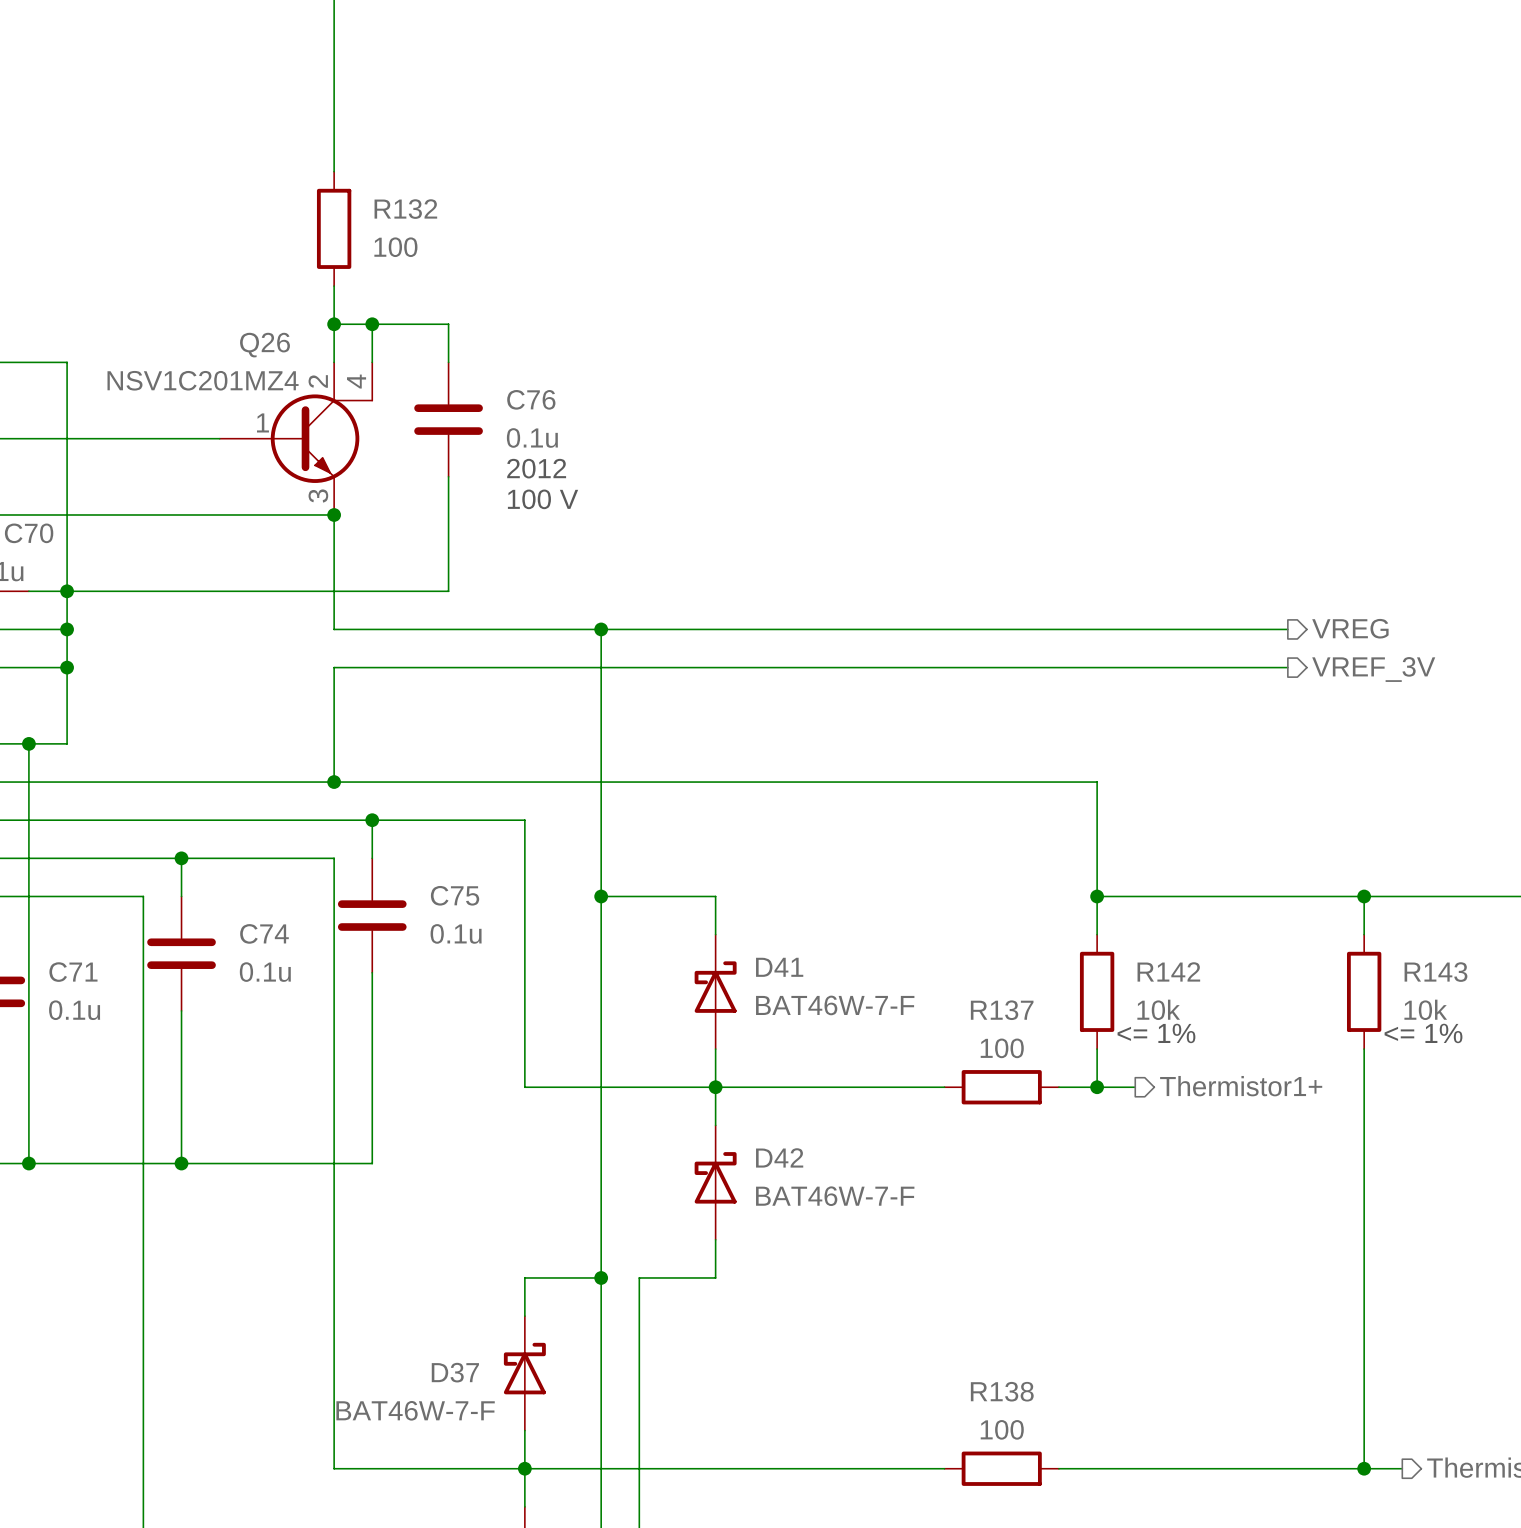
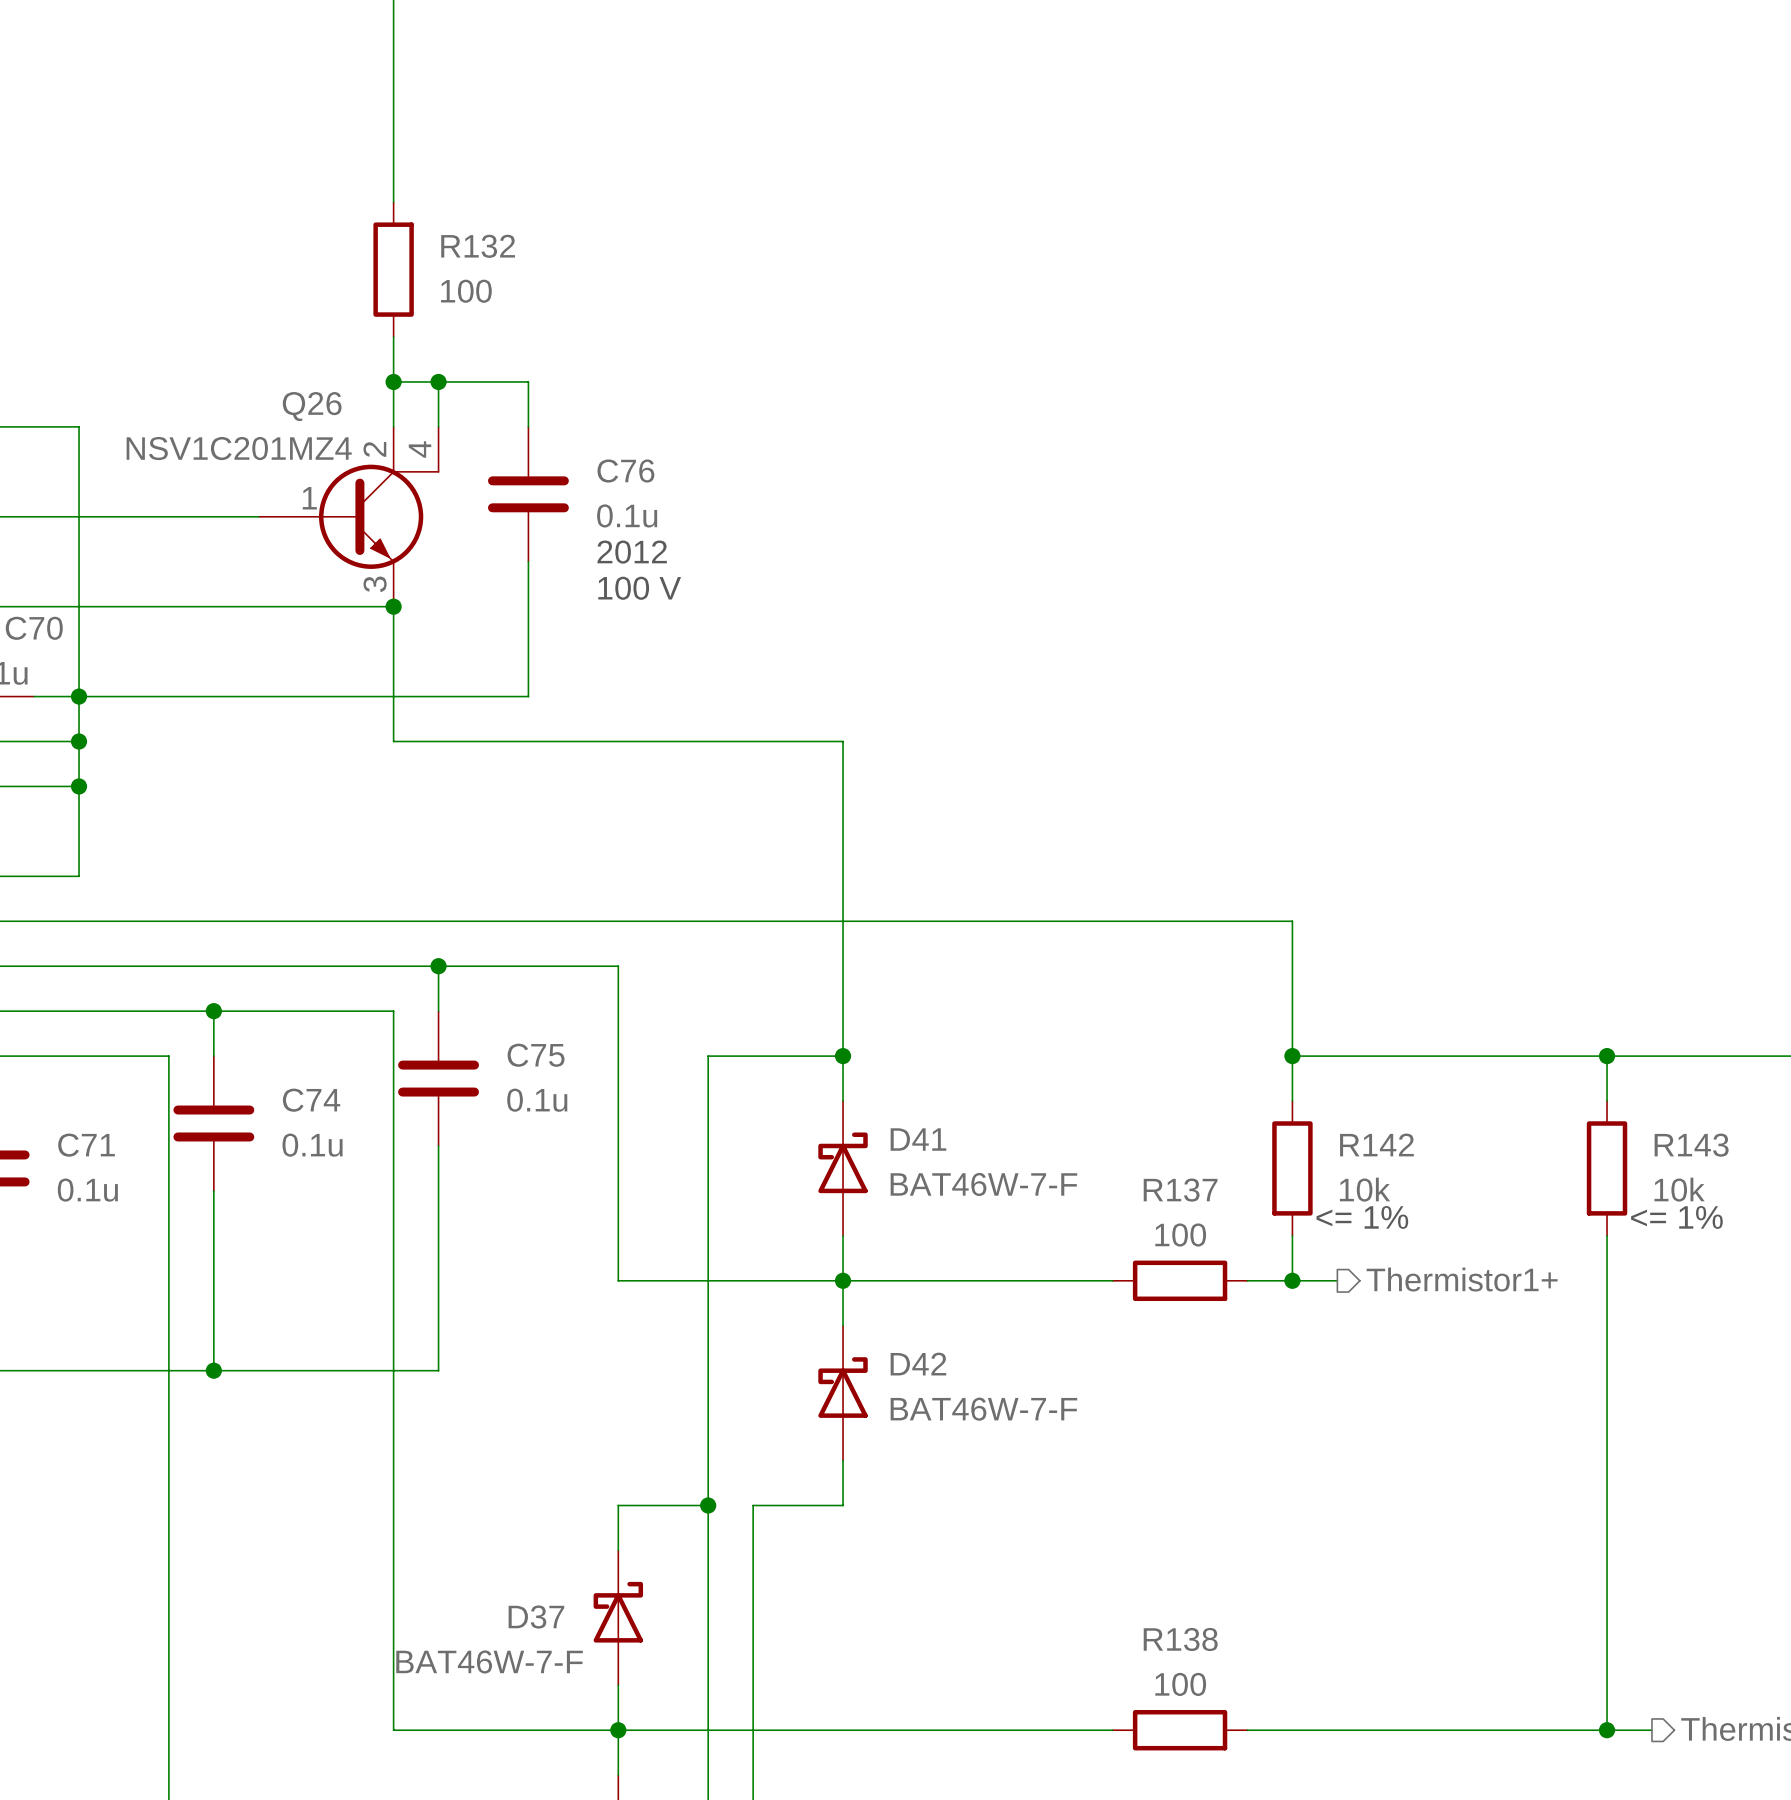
hierarchical label: VREG (1350, 628) -> none
wire: (601, 629) (601, 896) -> none
junction: (601, 629) -> none
wire: (715, 629) (1287, 629) -> (843, 741) (843, 1056)
wire: (1287, 667) (334, 667) (334, 782) -> none
hierarchical label: VREF_3V (1373, 669) -> none
wire: (28, 743) (28, 1163) -> none
junction: (28, 743) -> none
junction: (334, 782) -> none
junction: (601, 896) -> none
junction: none -> (843, 1056)
junction: (28, 1163) -> none

